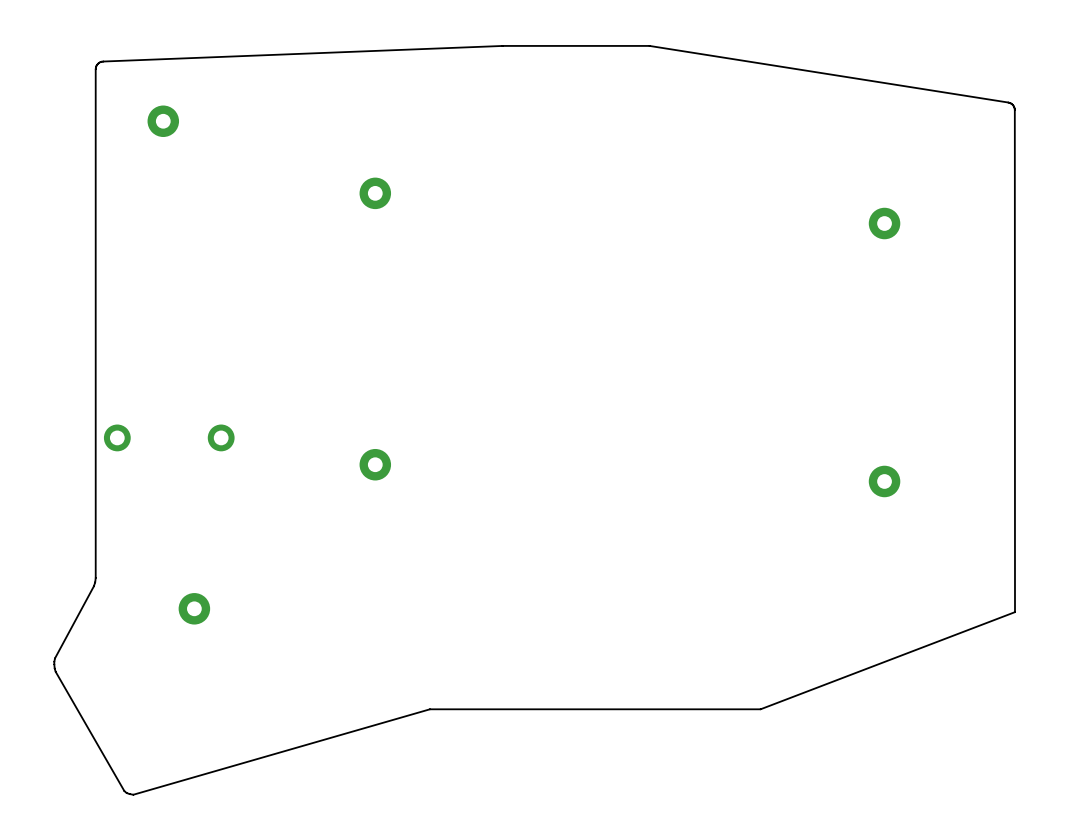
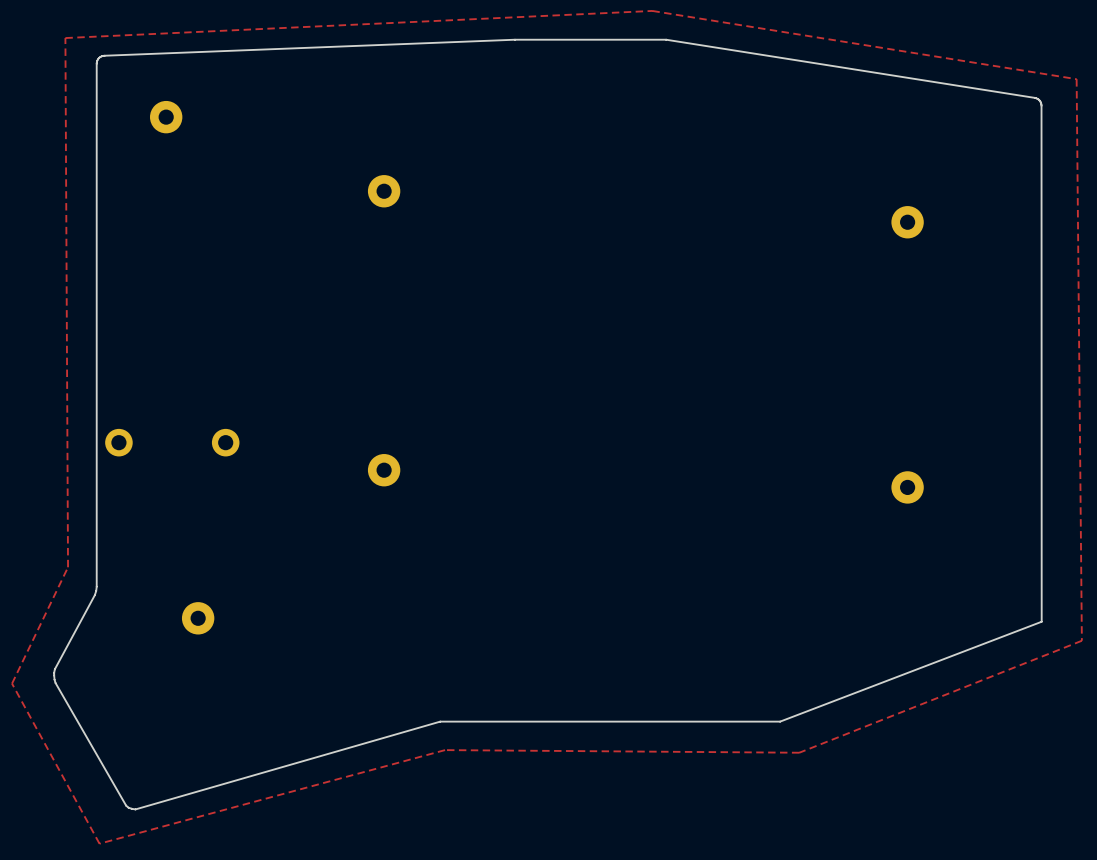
zone outline: none -> (652, 10) (65, 38) (68, 567) (12, 683) (99, 843) (445, 750) (799, 752) (1081, 640) (1076, 79) (652, 10)

